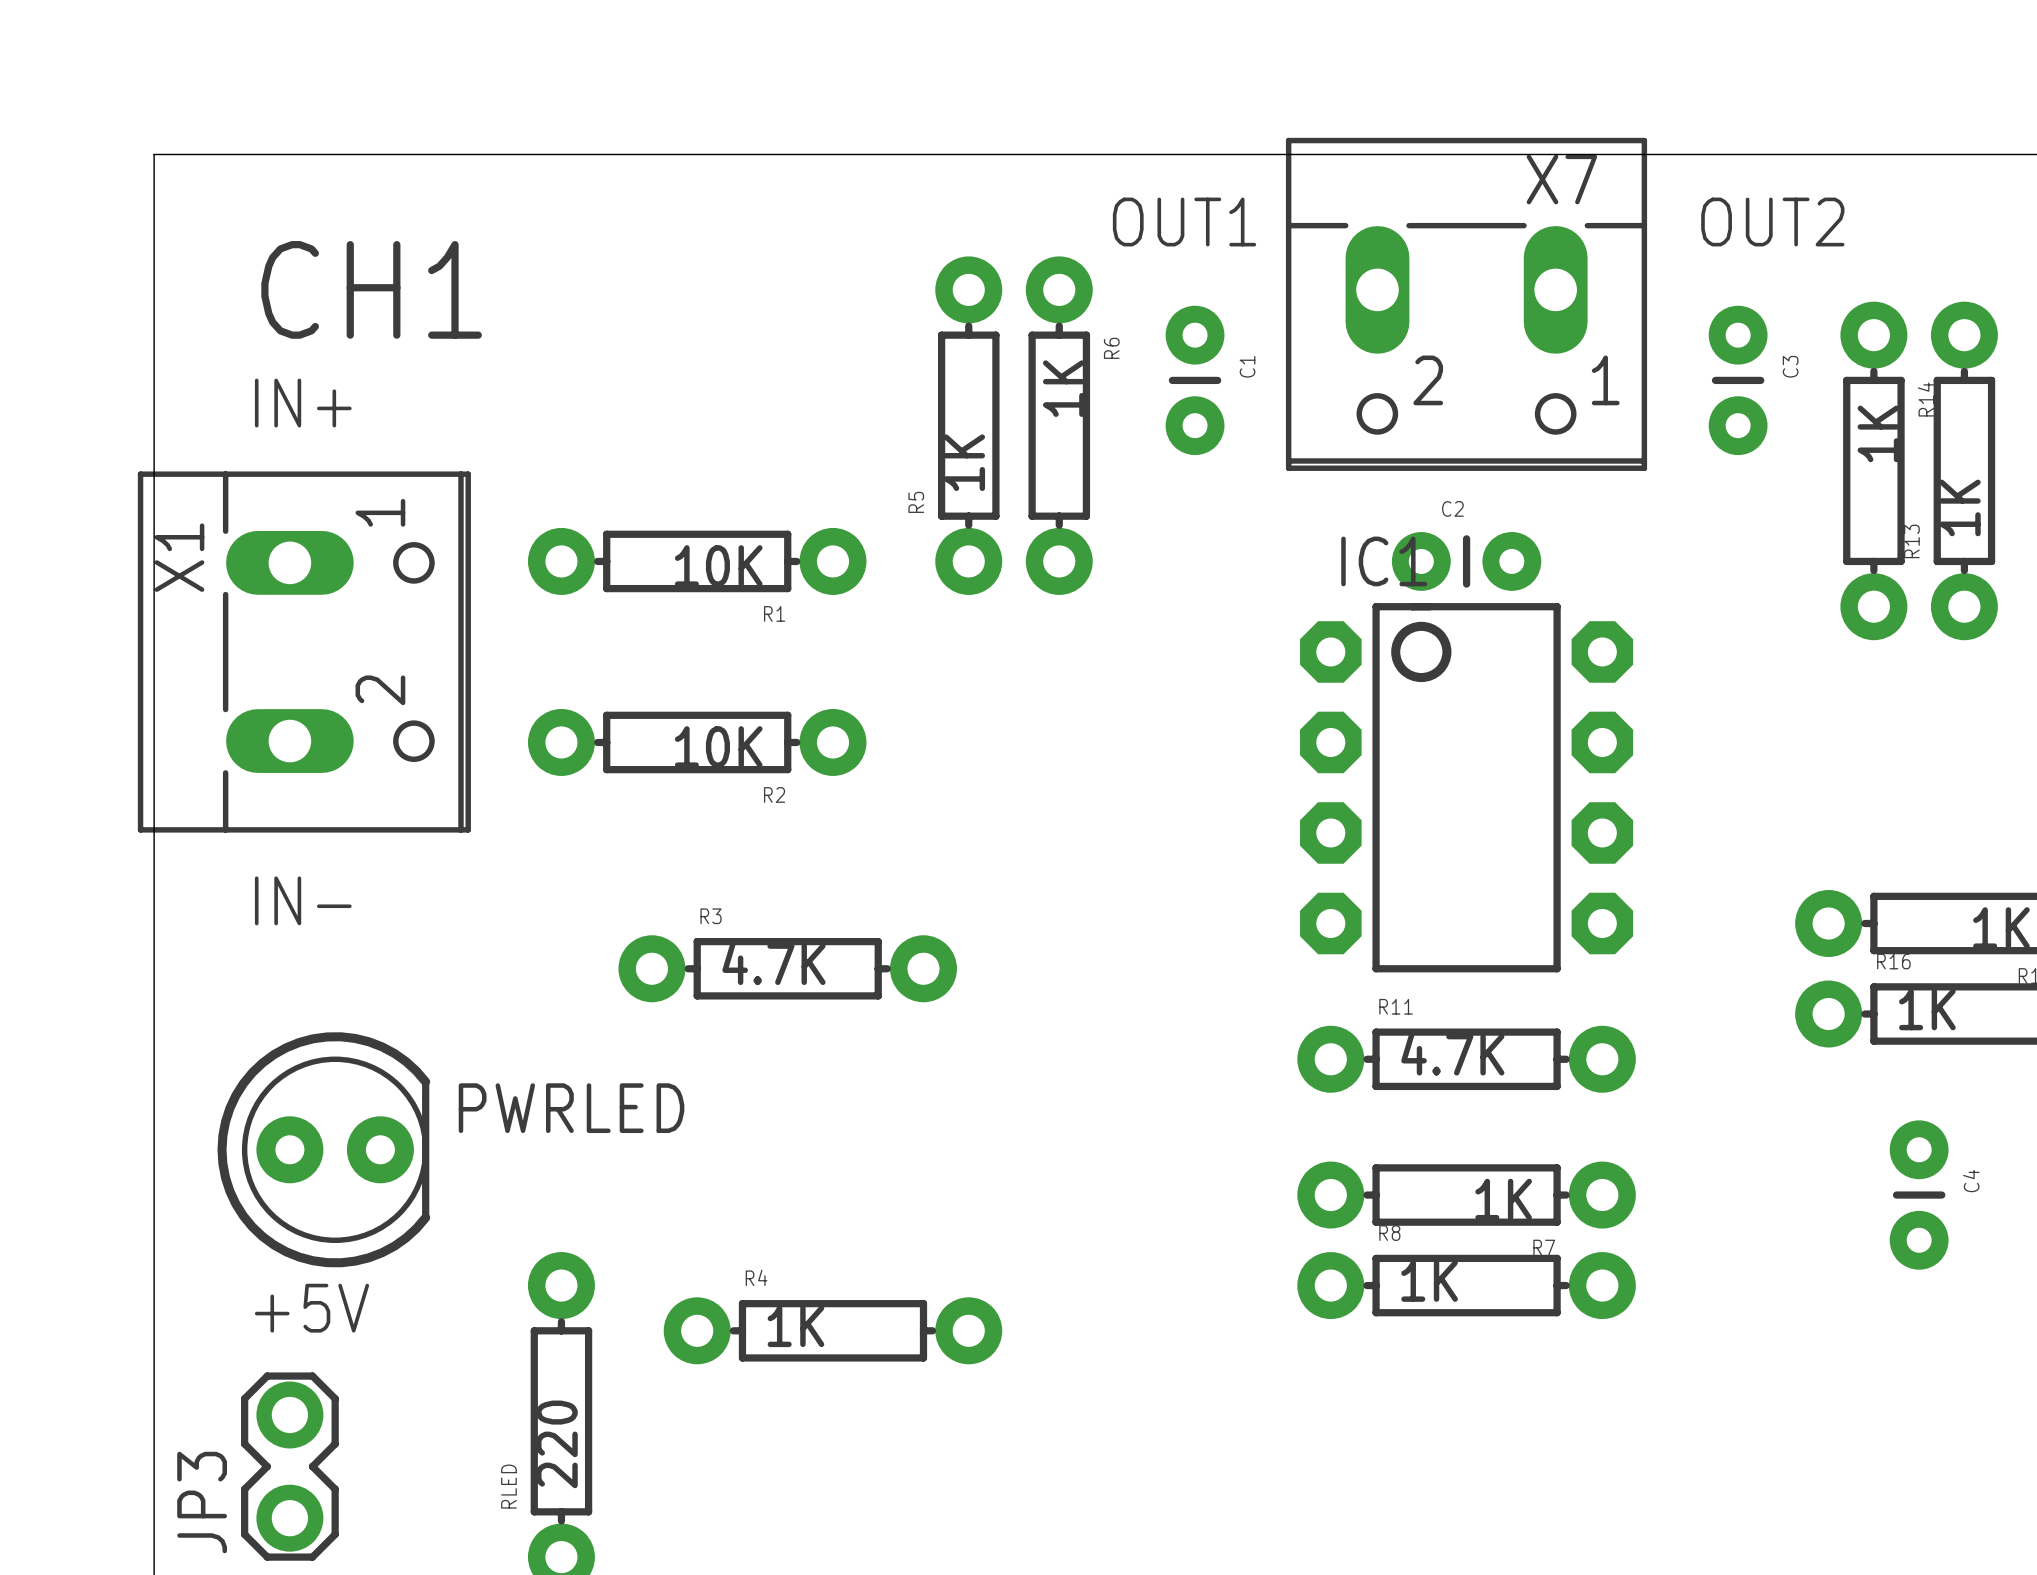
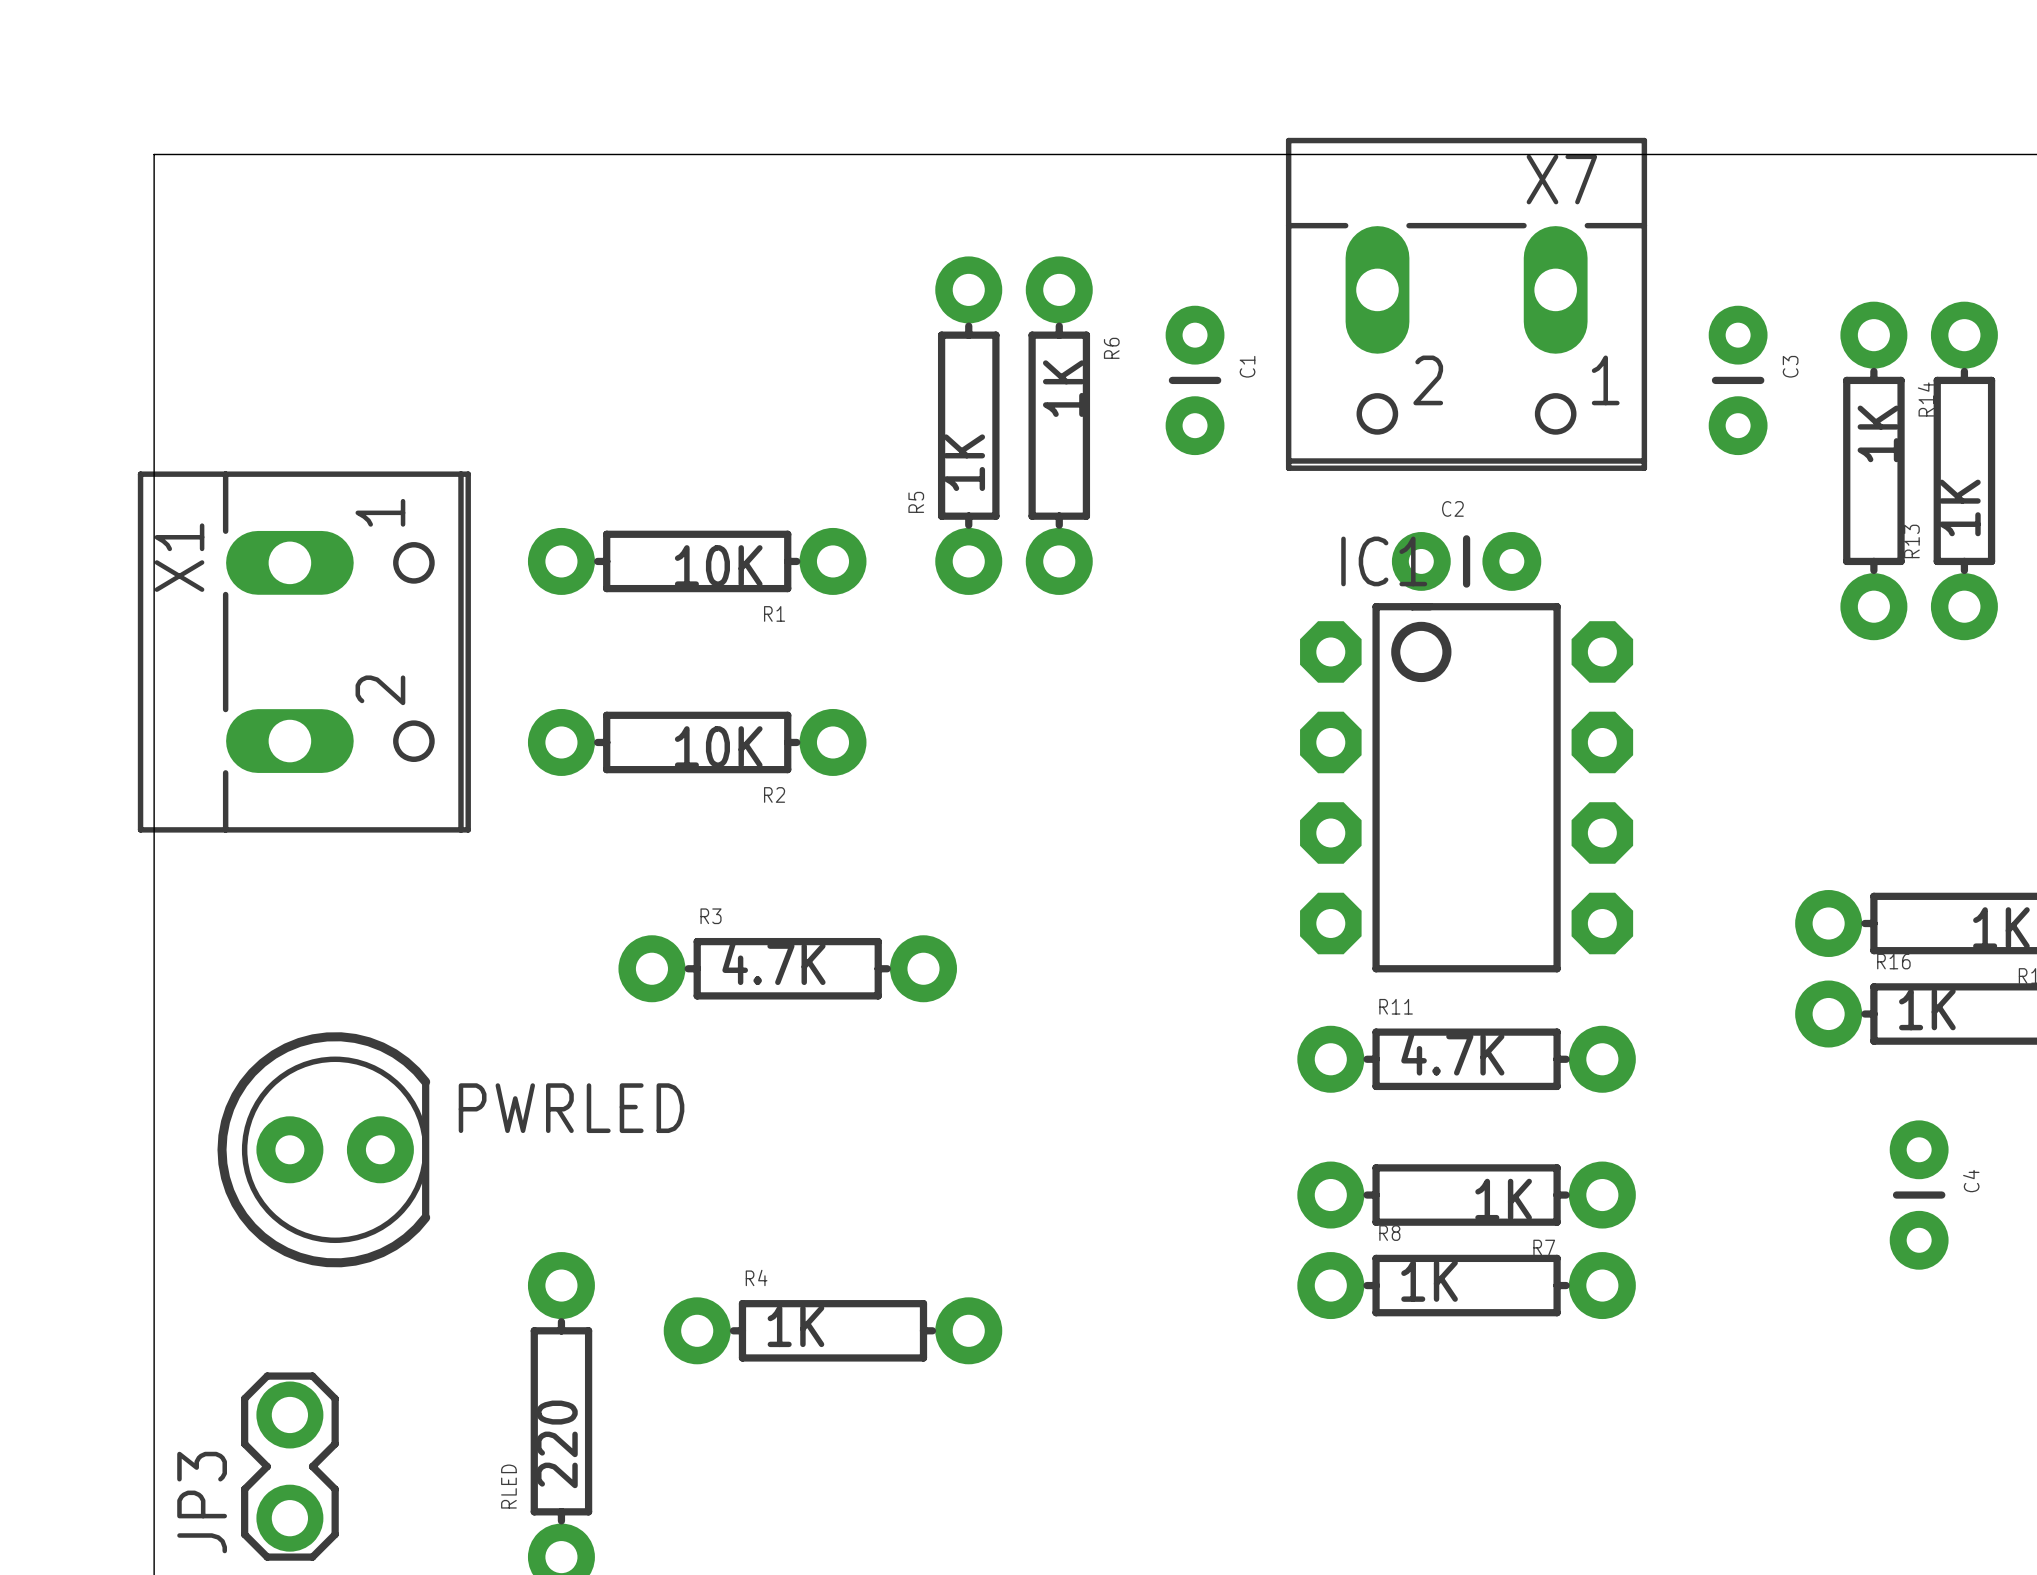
text: OUT1 (1184, 222) -> none
text: OUT2 (1772, 222) -> none
text: CH1 (371, 289) -> none
text: IN+ (303, 403) -> none
text: IN- (303, 900) -> none
text: +5V (312, 1308) -> none

